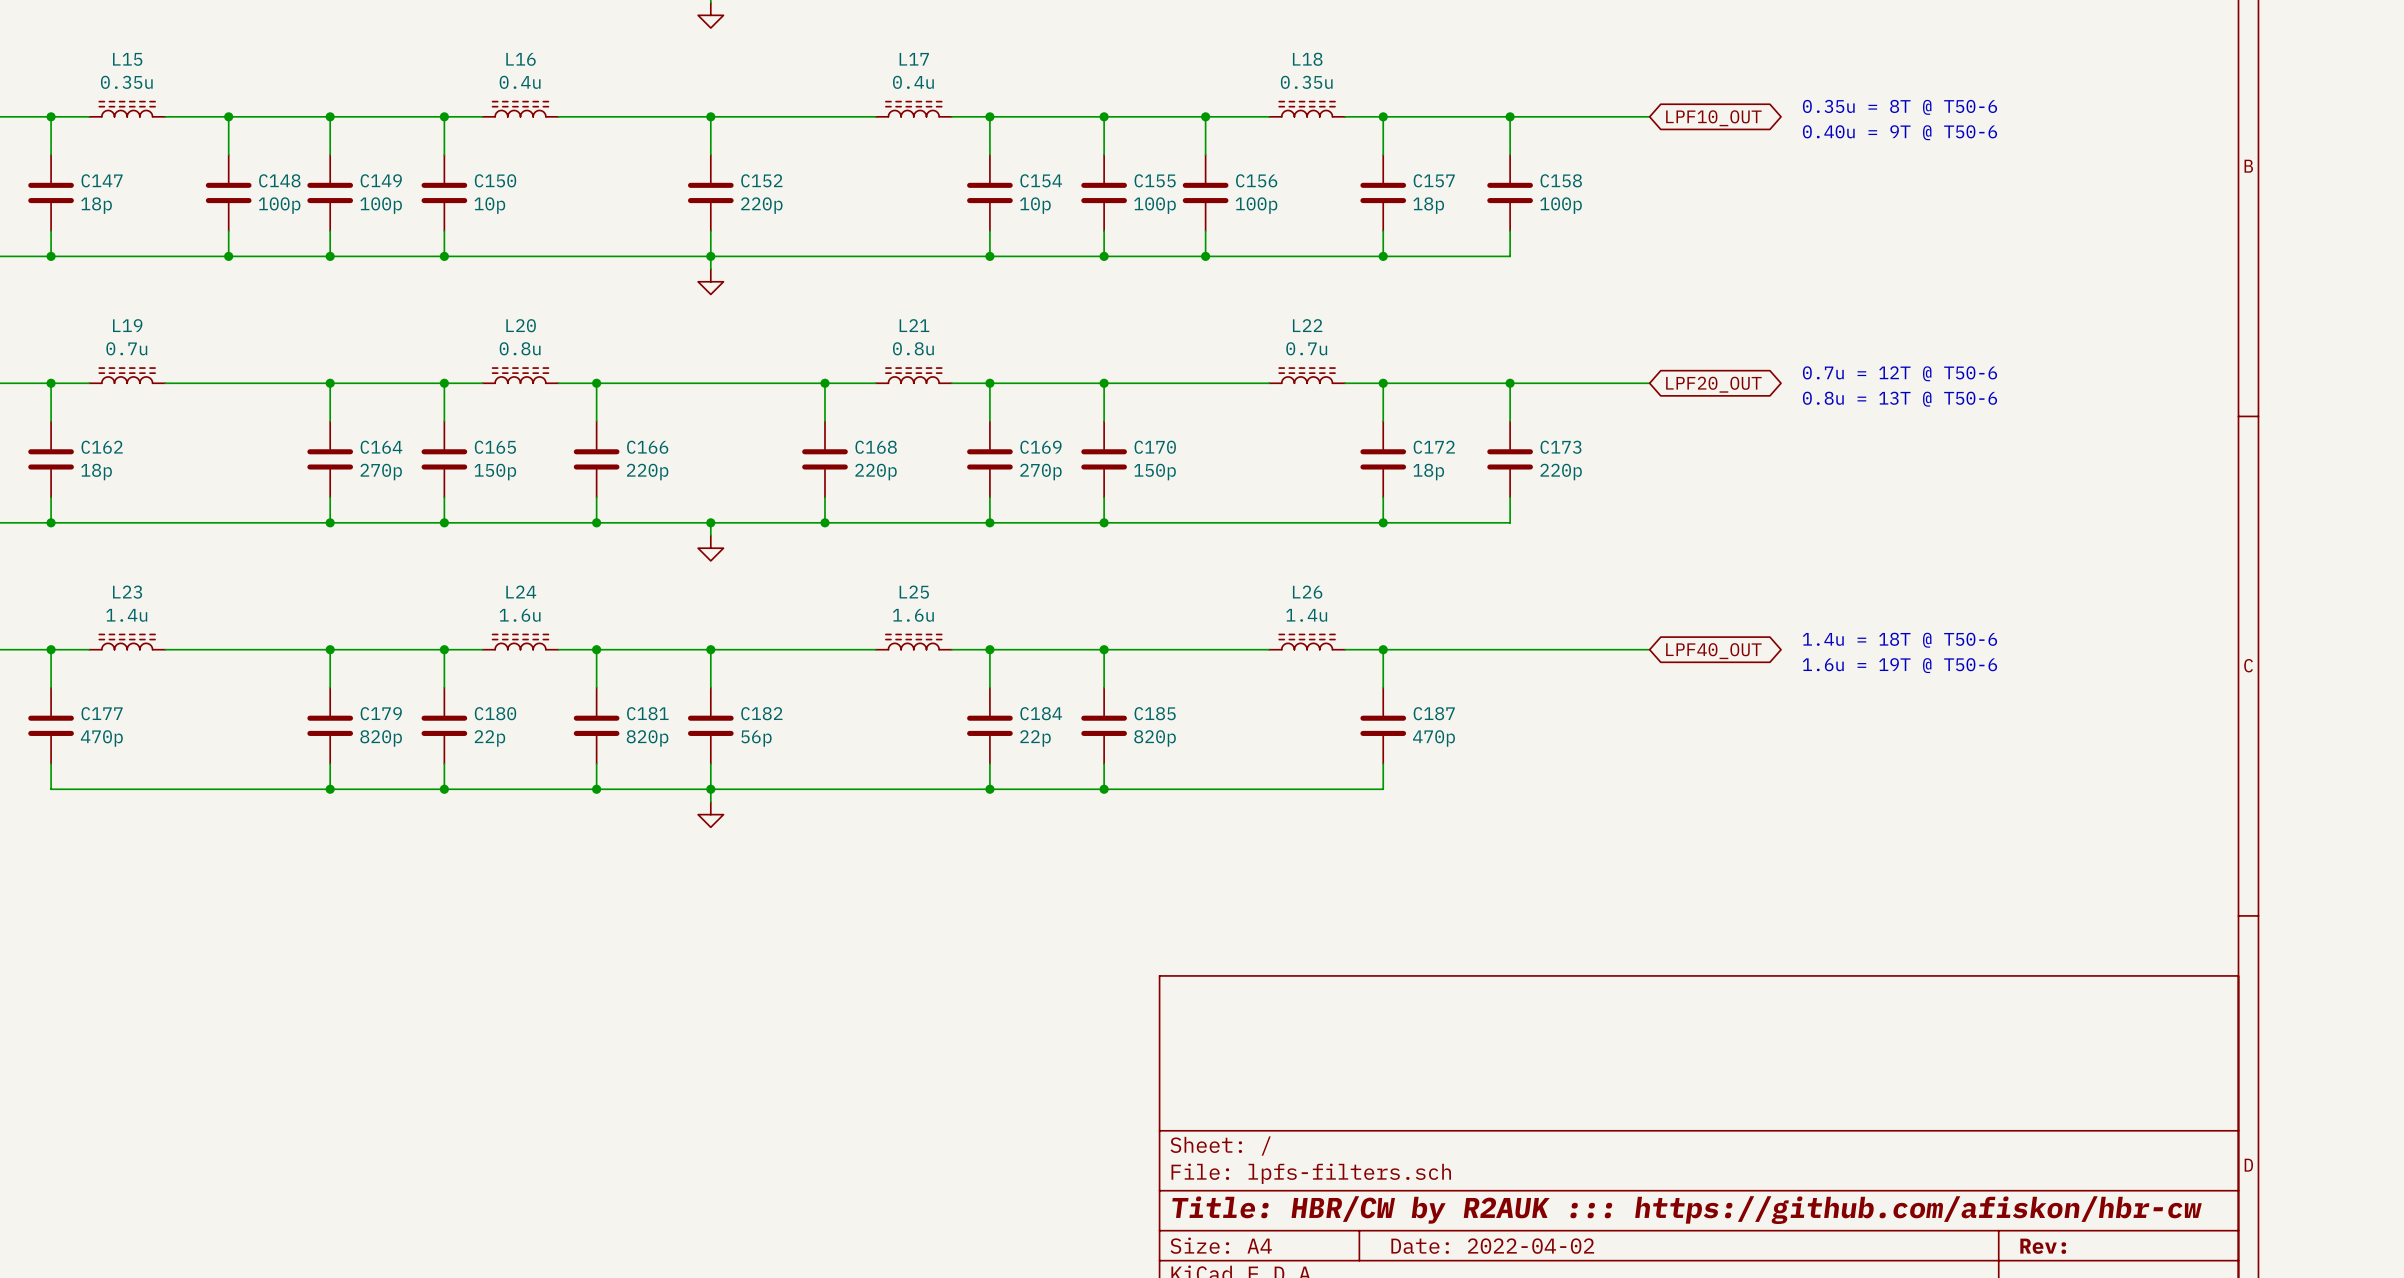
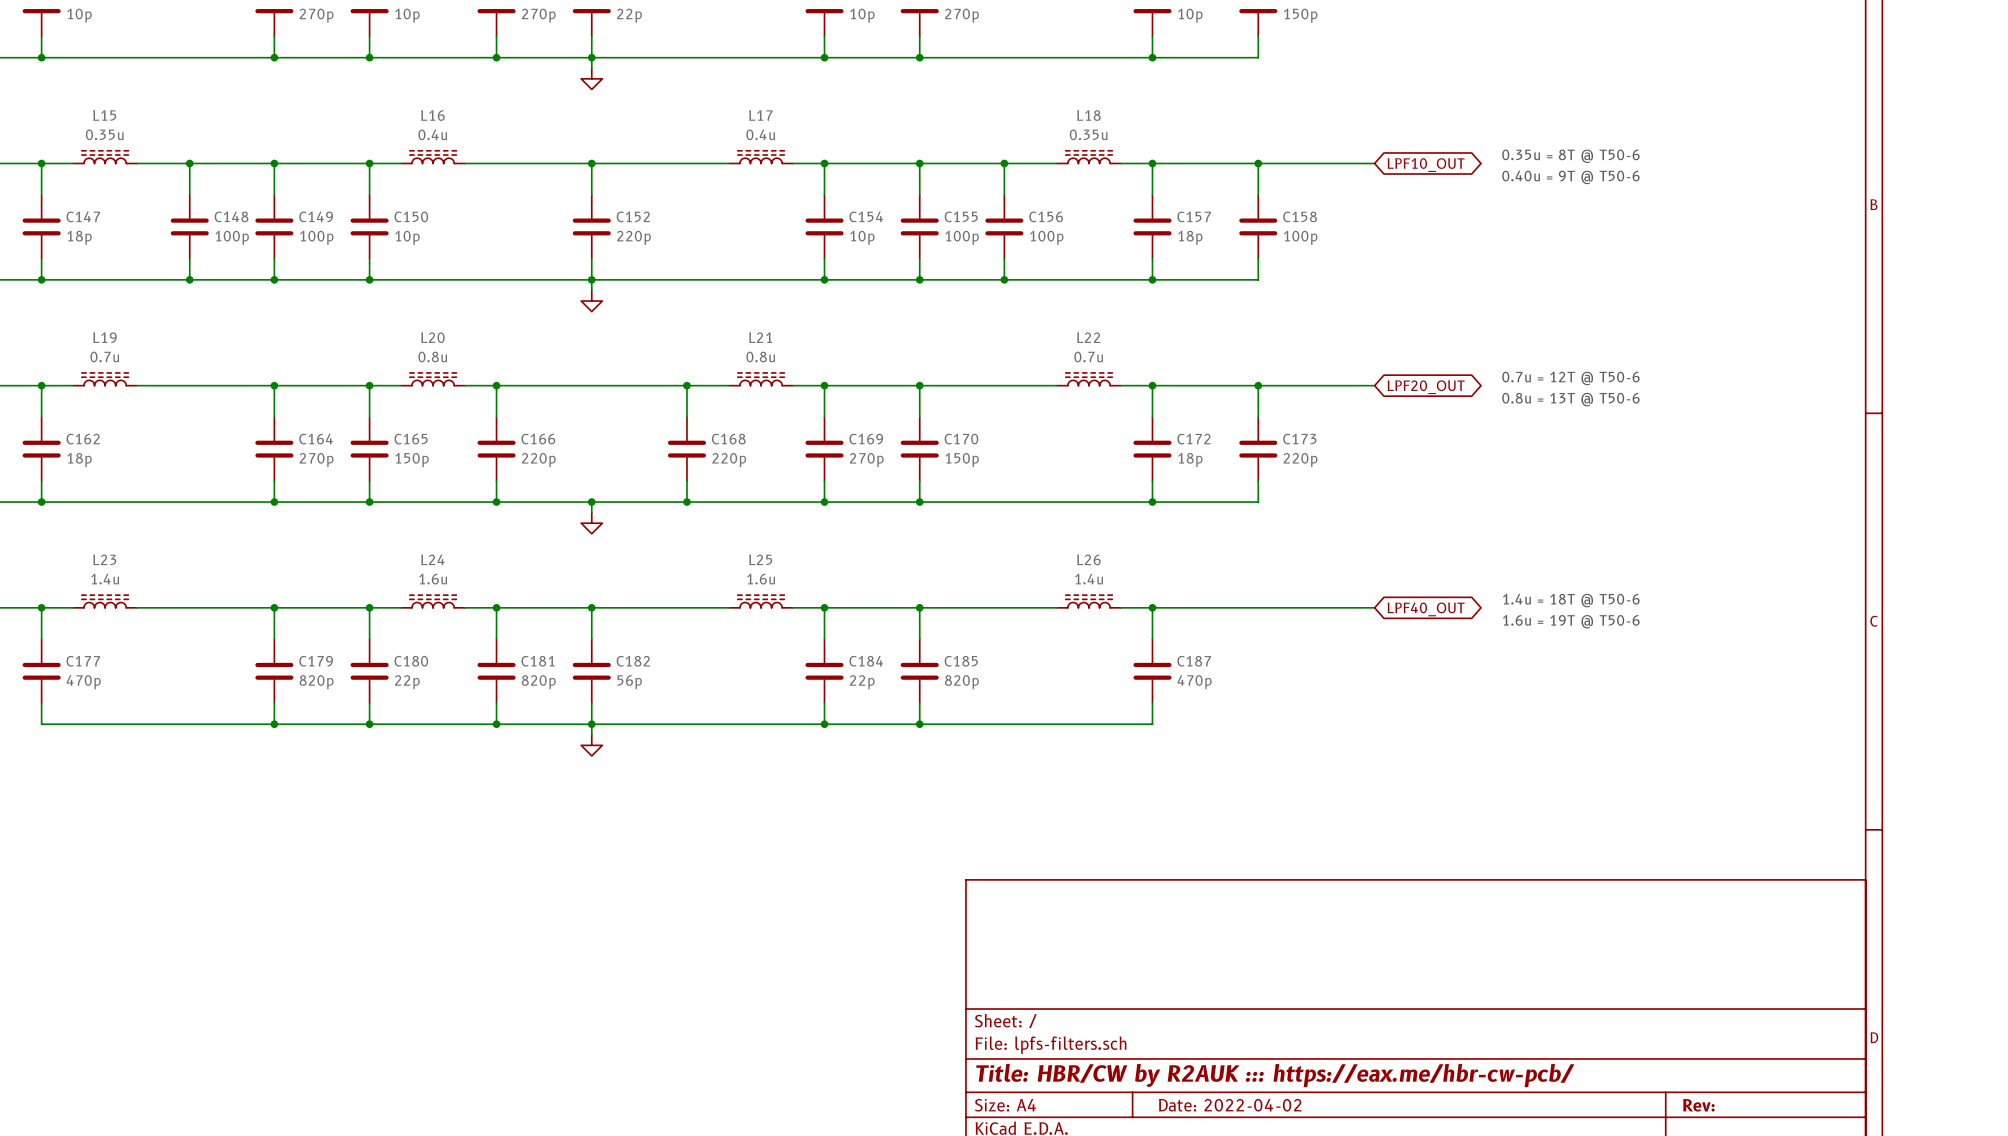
title block: Title: HBR/CW by R2AUK ::: https://github.com/afiskon/hbr-cw (1687, 1210) -> Title: HBR/CW by R2AUK ::: https://eax.me/hbr-cw-pcb/ (1275, 1075)

